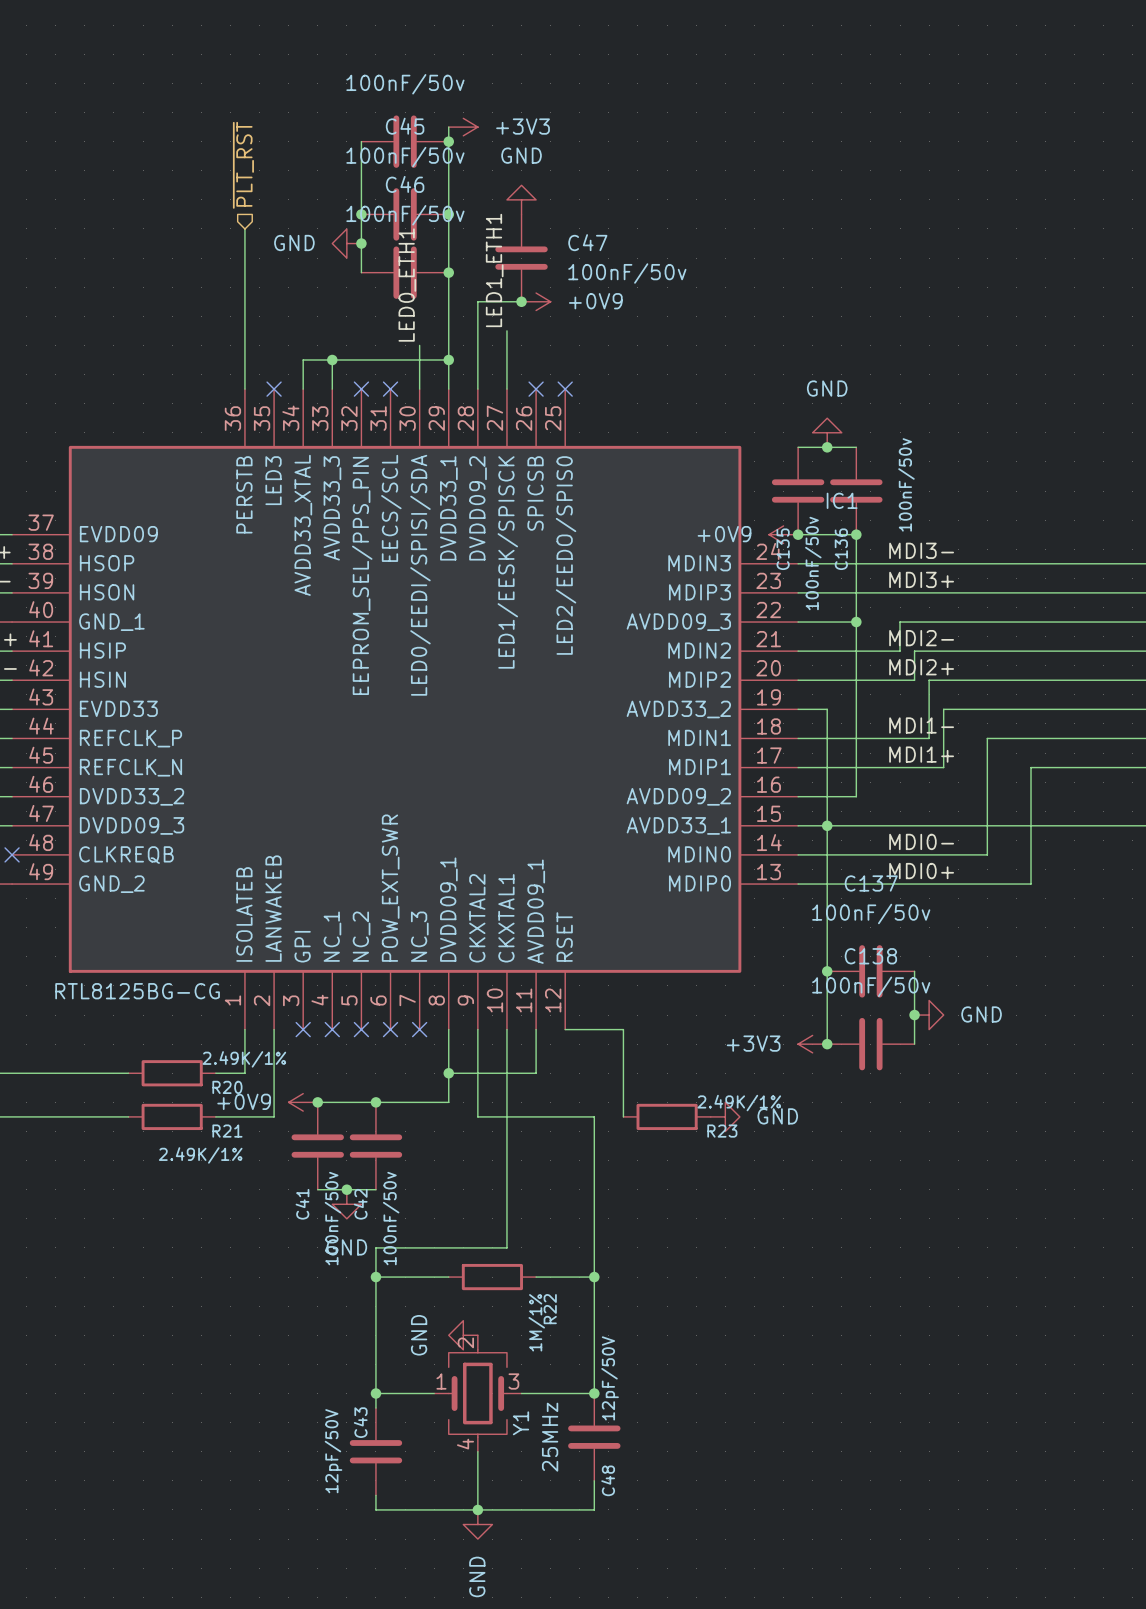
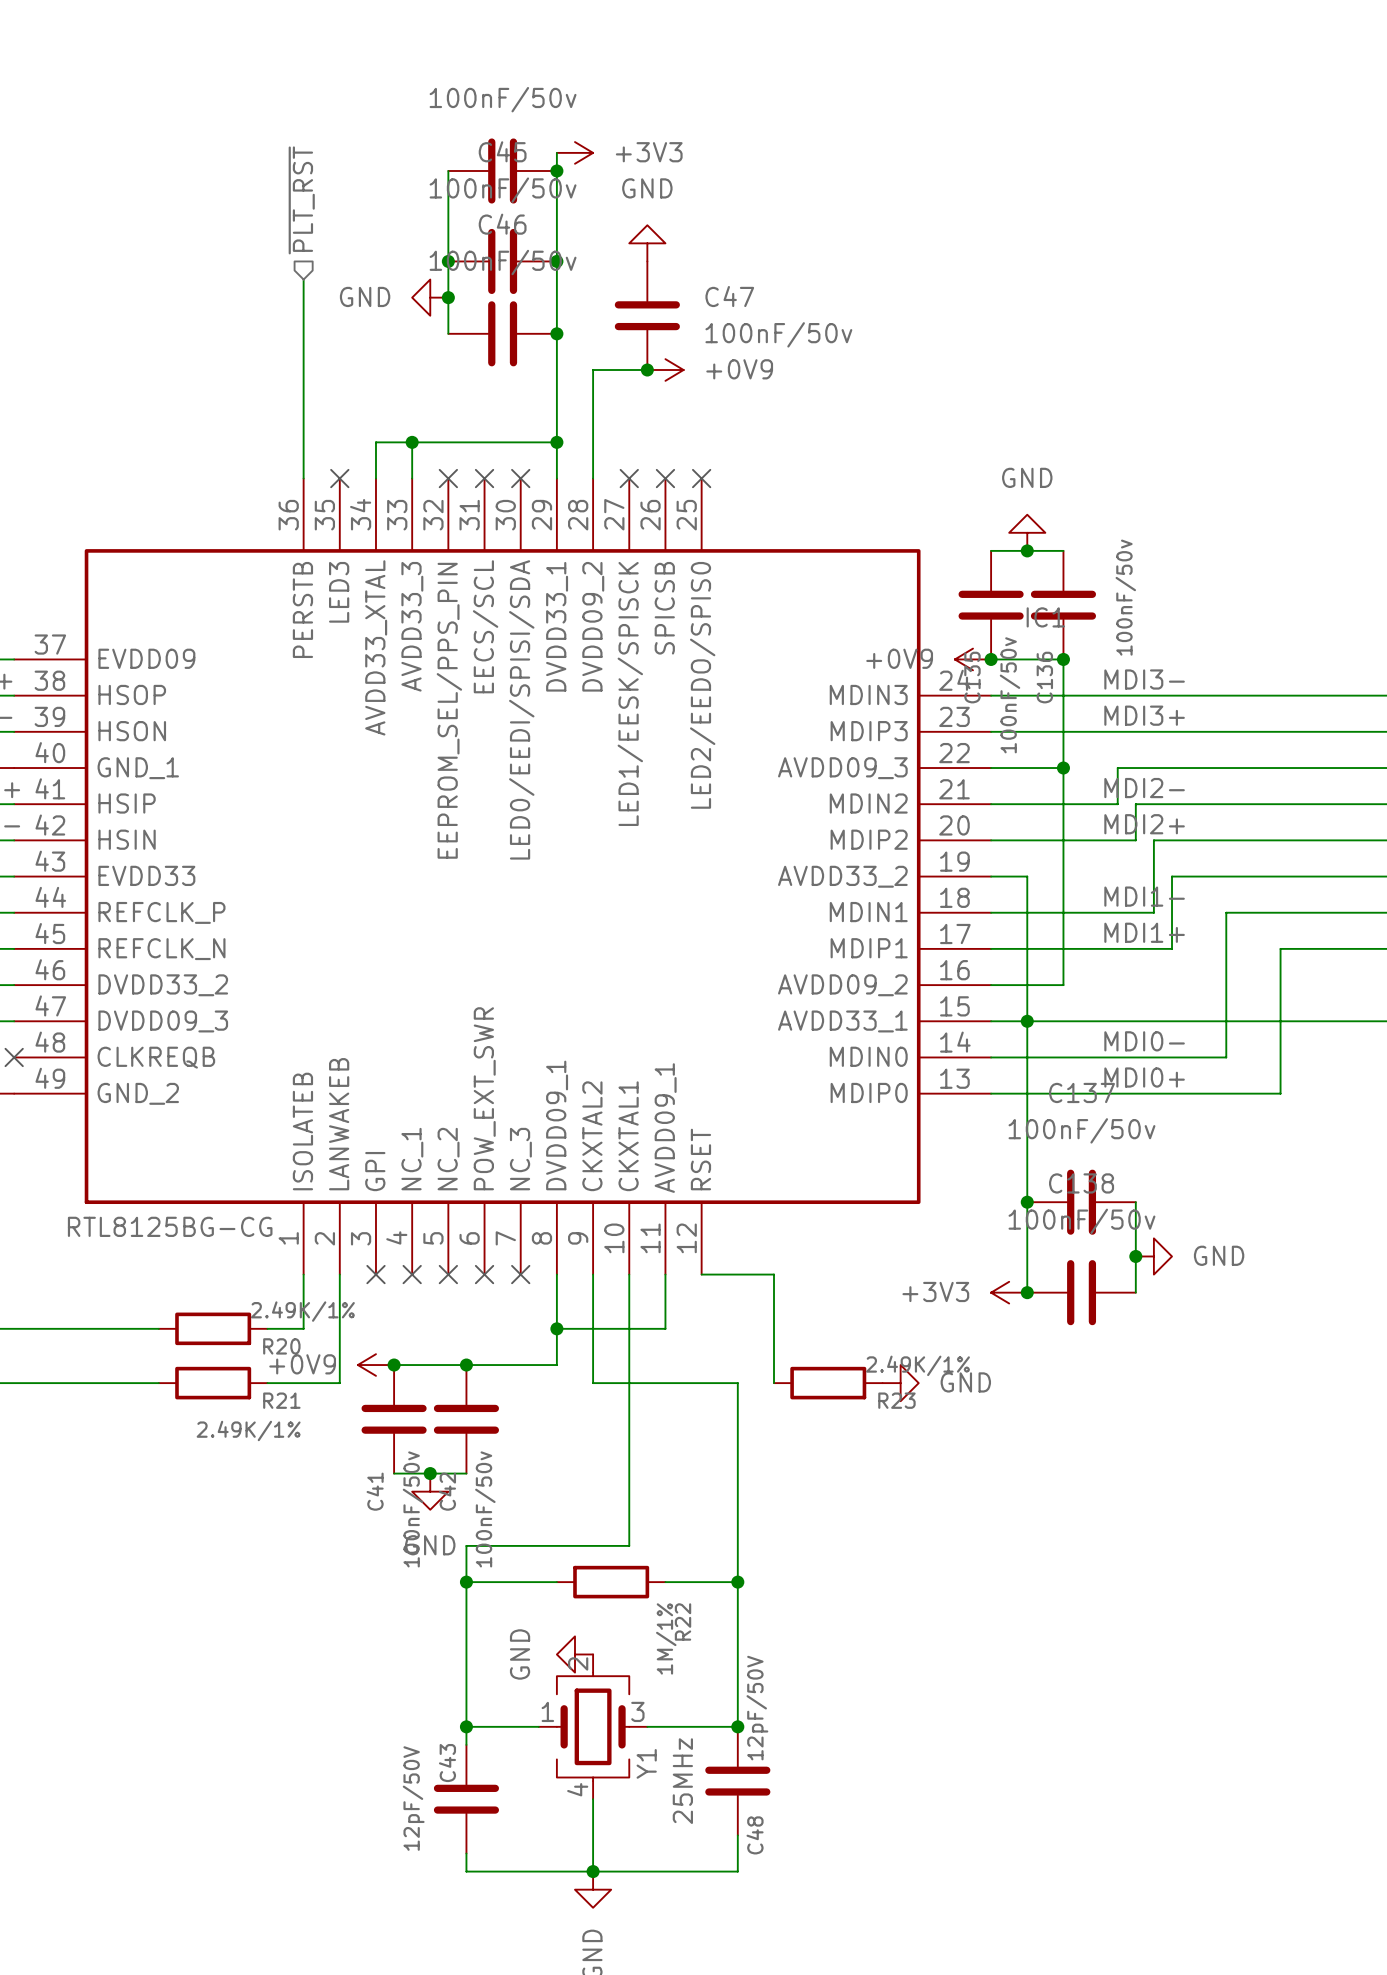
label: LED1_ETH1 (494, 270) -> none
label: LED0_ETH1 (407, 285) -> none
wire: (506, 330) (506, 389) -> none
wire: (419, 345) (419, 389) -> none
no-connect mark: none -> (520, 478)
no-connect mark: none -> (629, 478)

